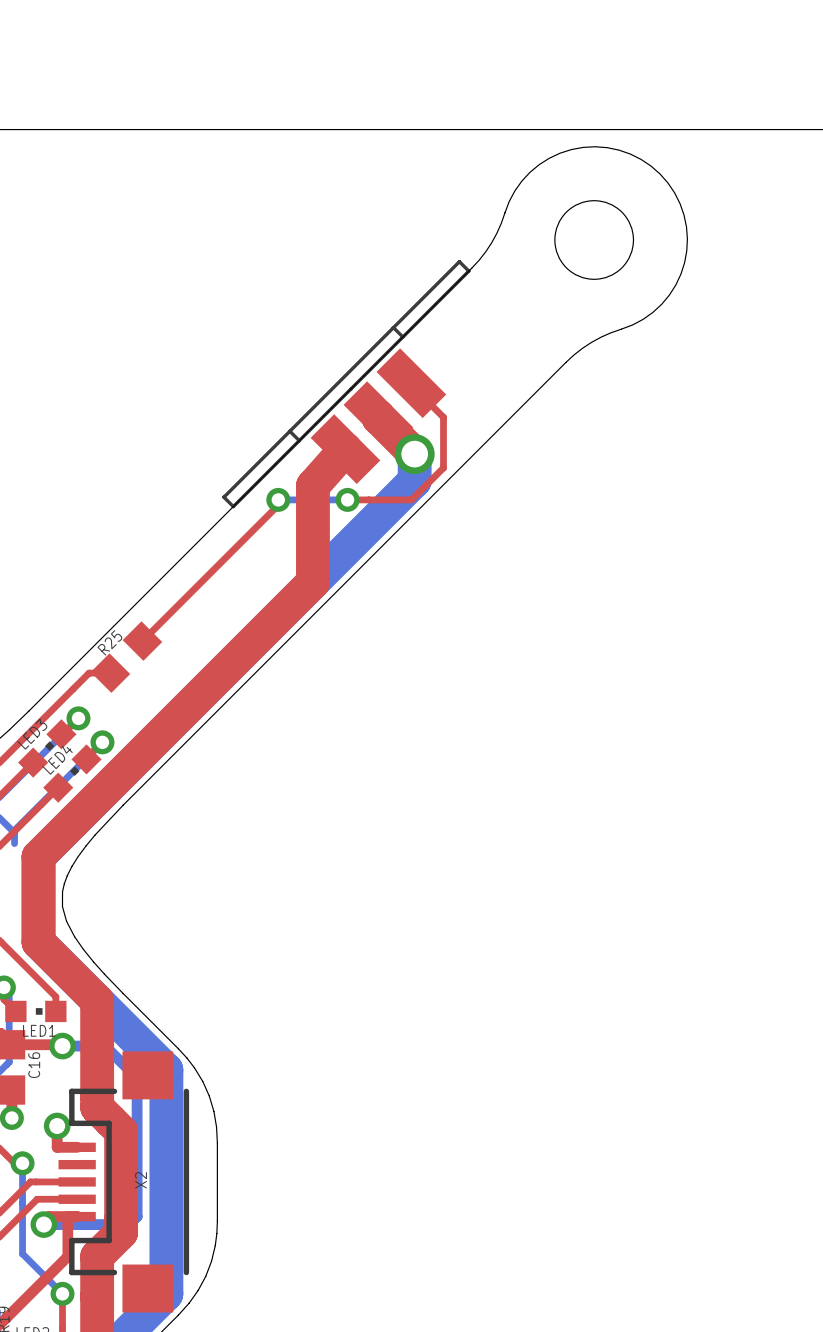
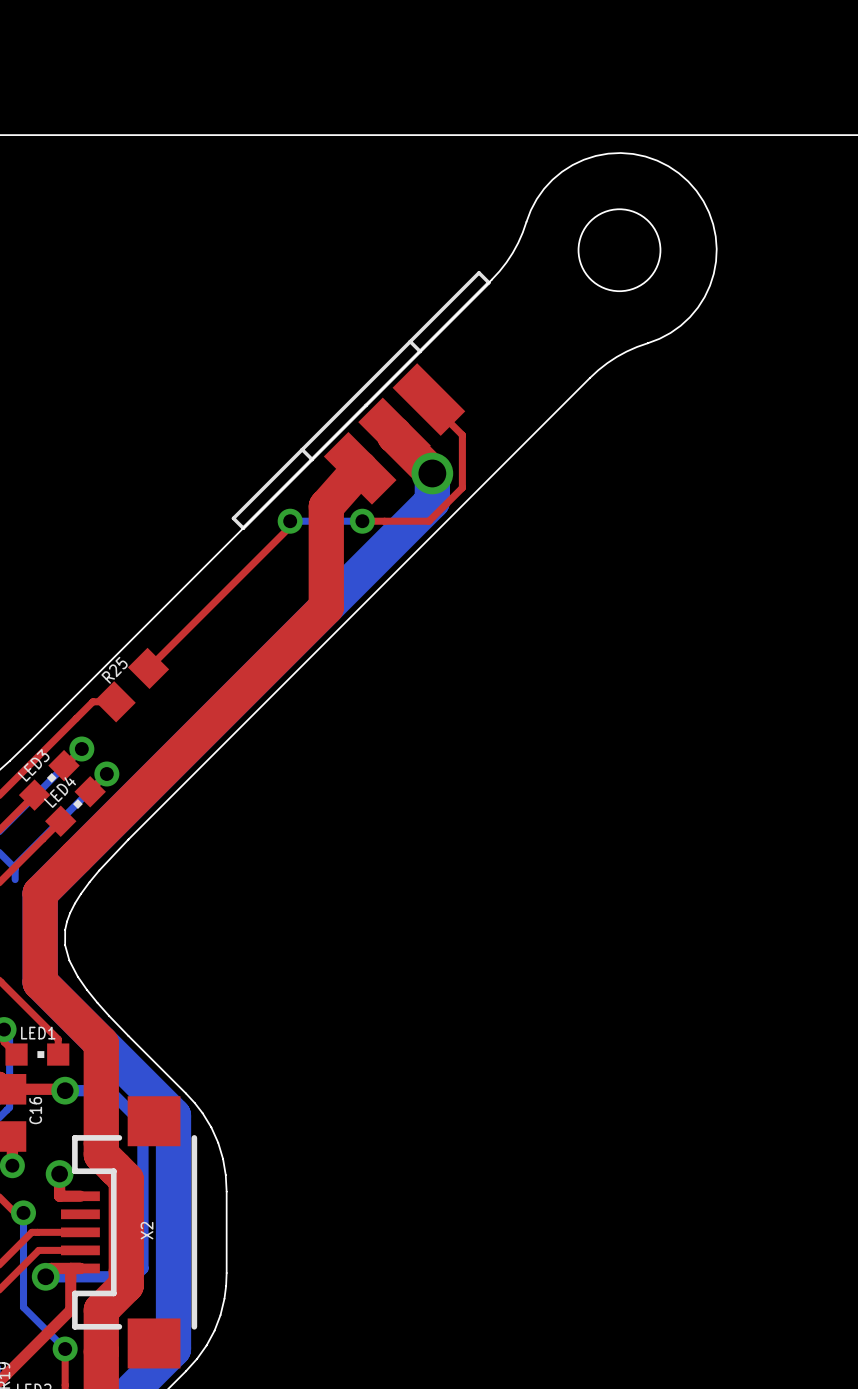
LED1 name position: LED1 (39, 1030) -> LED1 (38, 1033)

